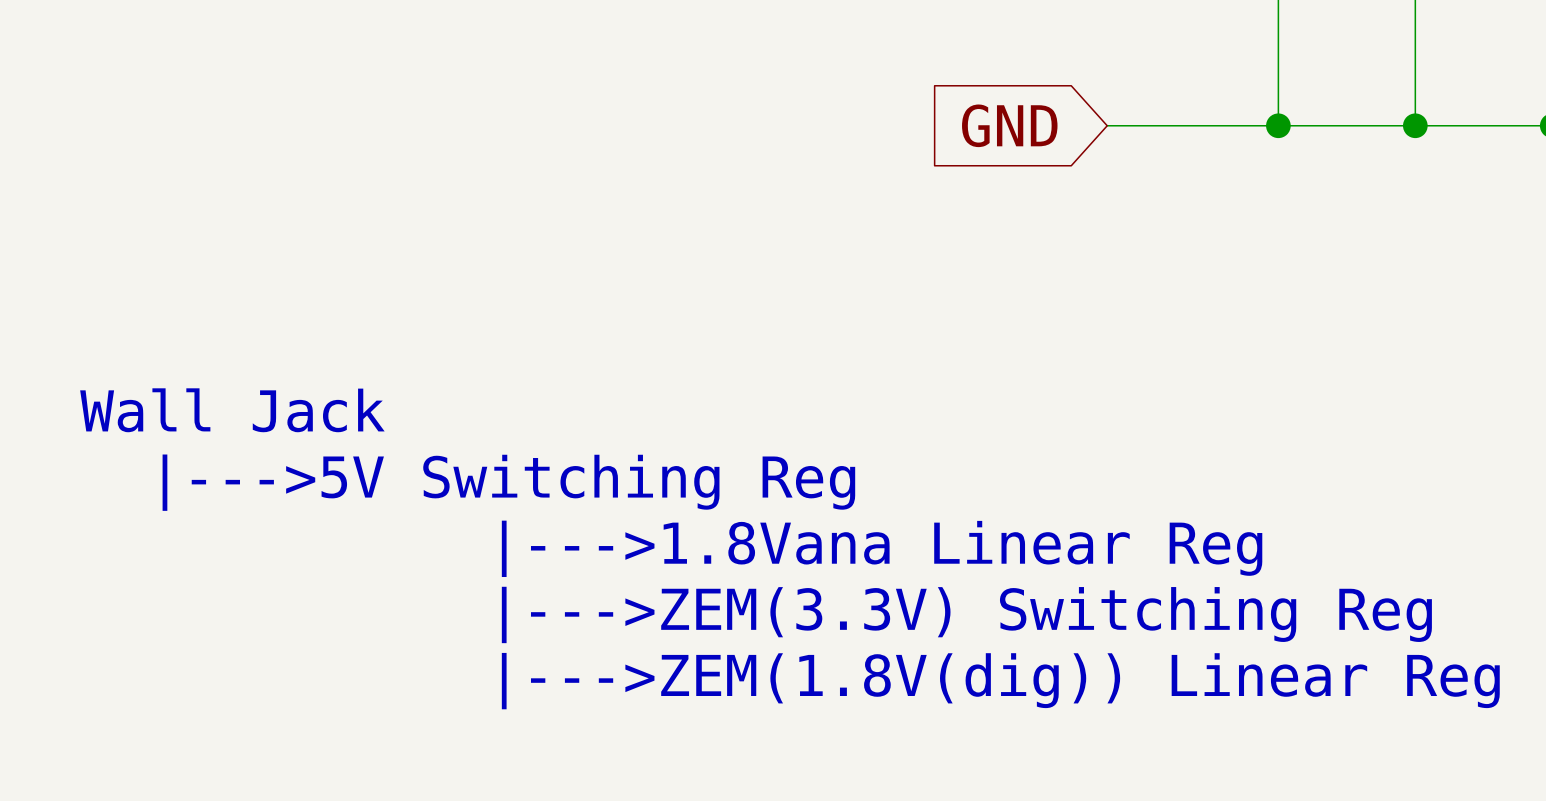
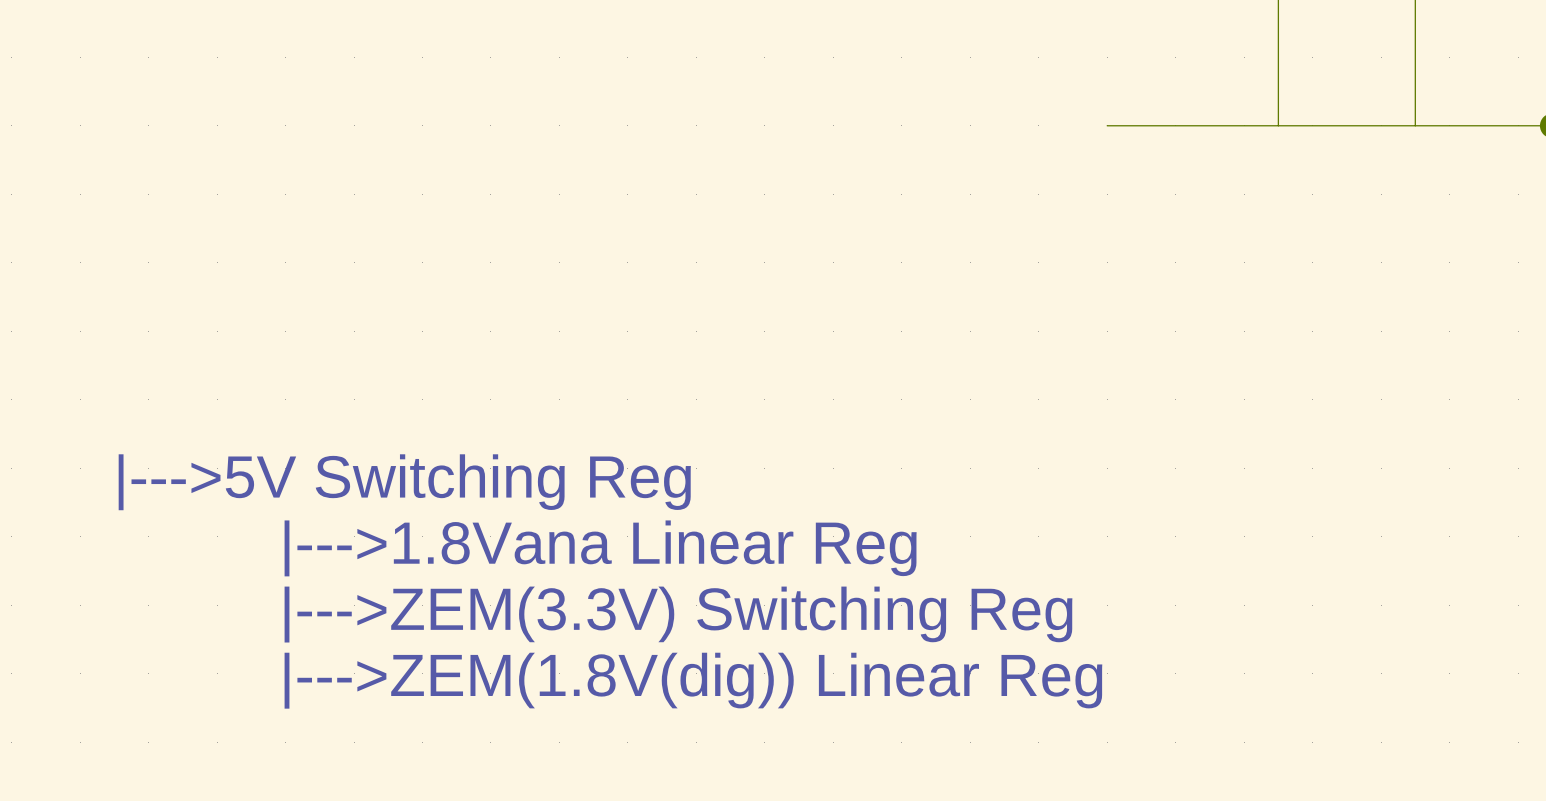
global label: GND (1009, 125) -> none
junction: (1278, 125) -> none
junction: (1415, 125) -> none
text: Wall Jack (232, 410) -> none

